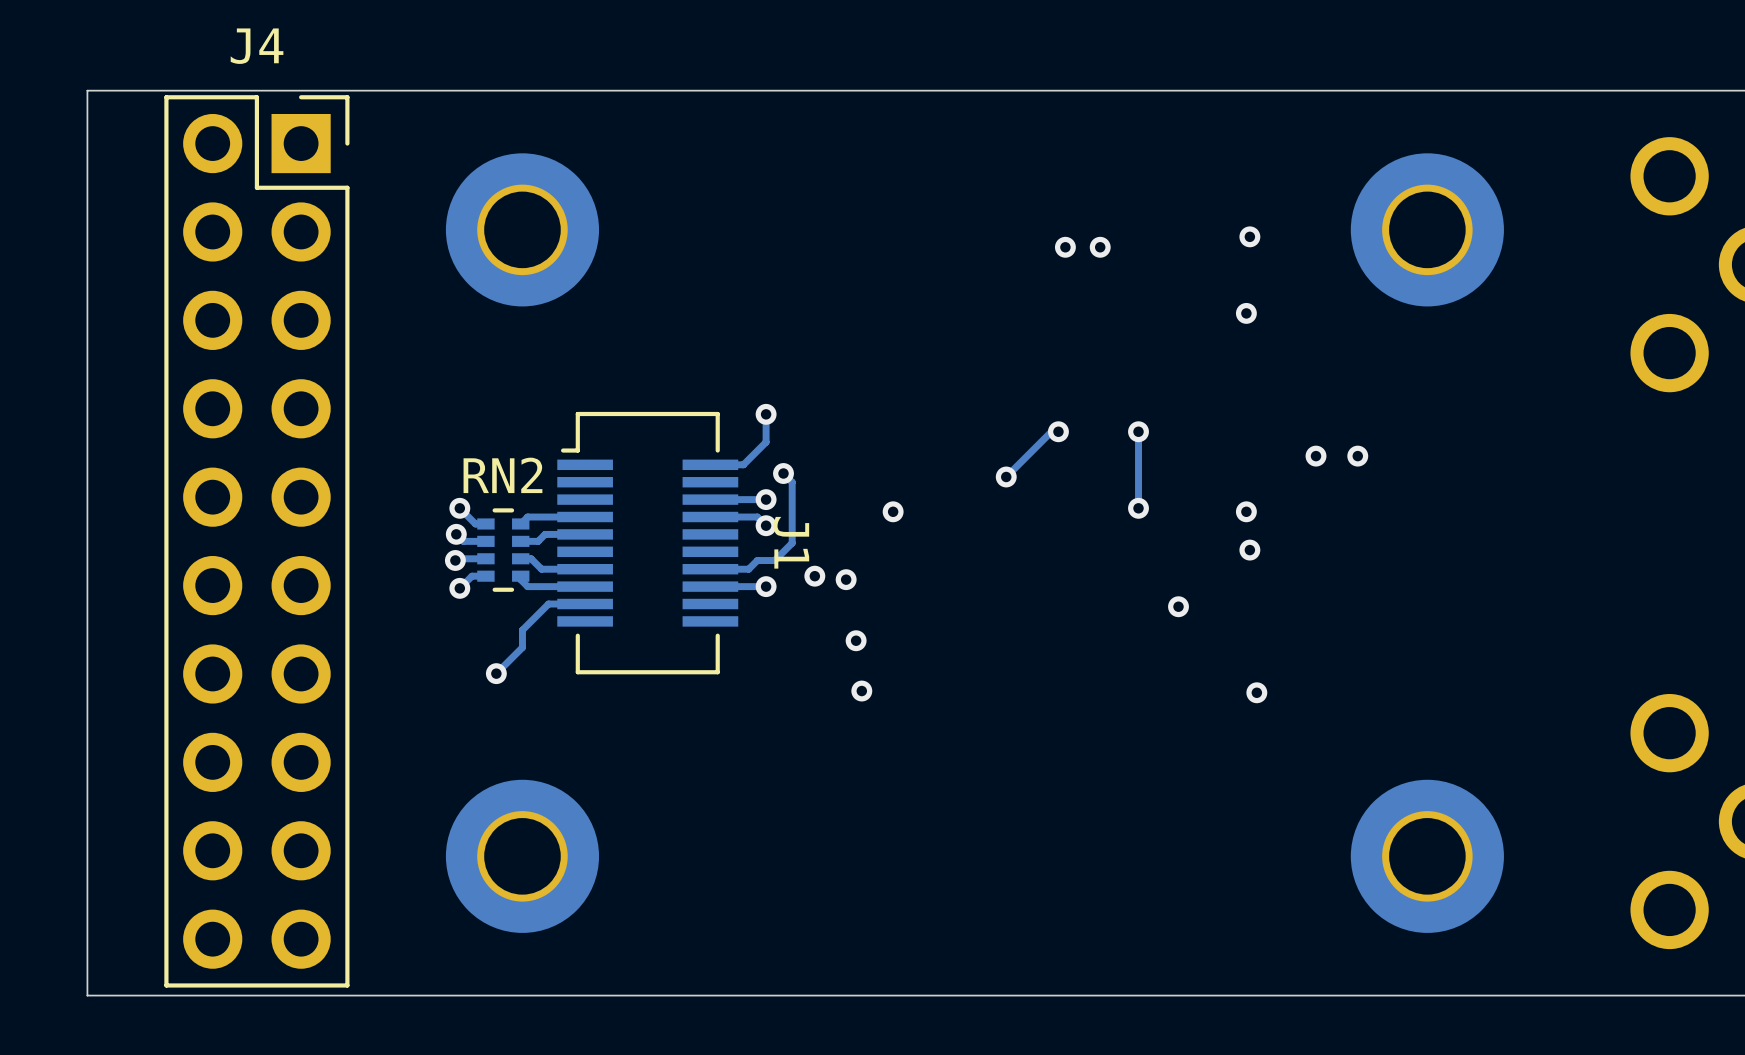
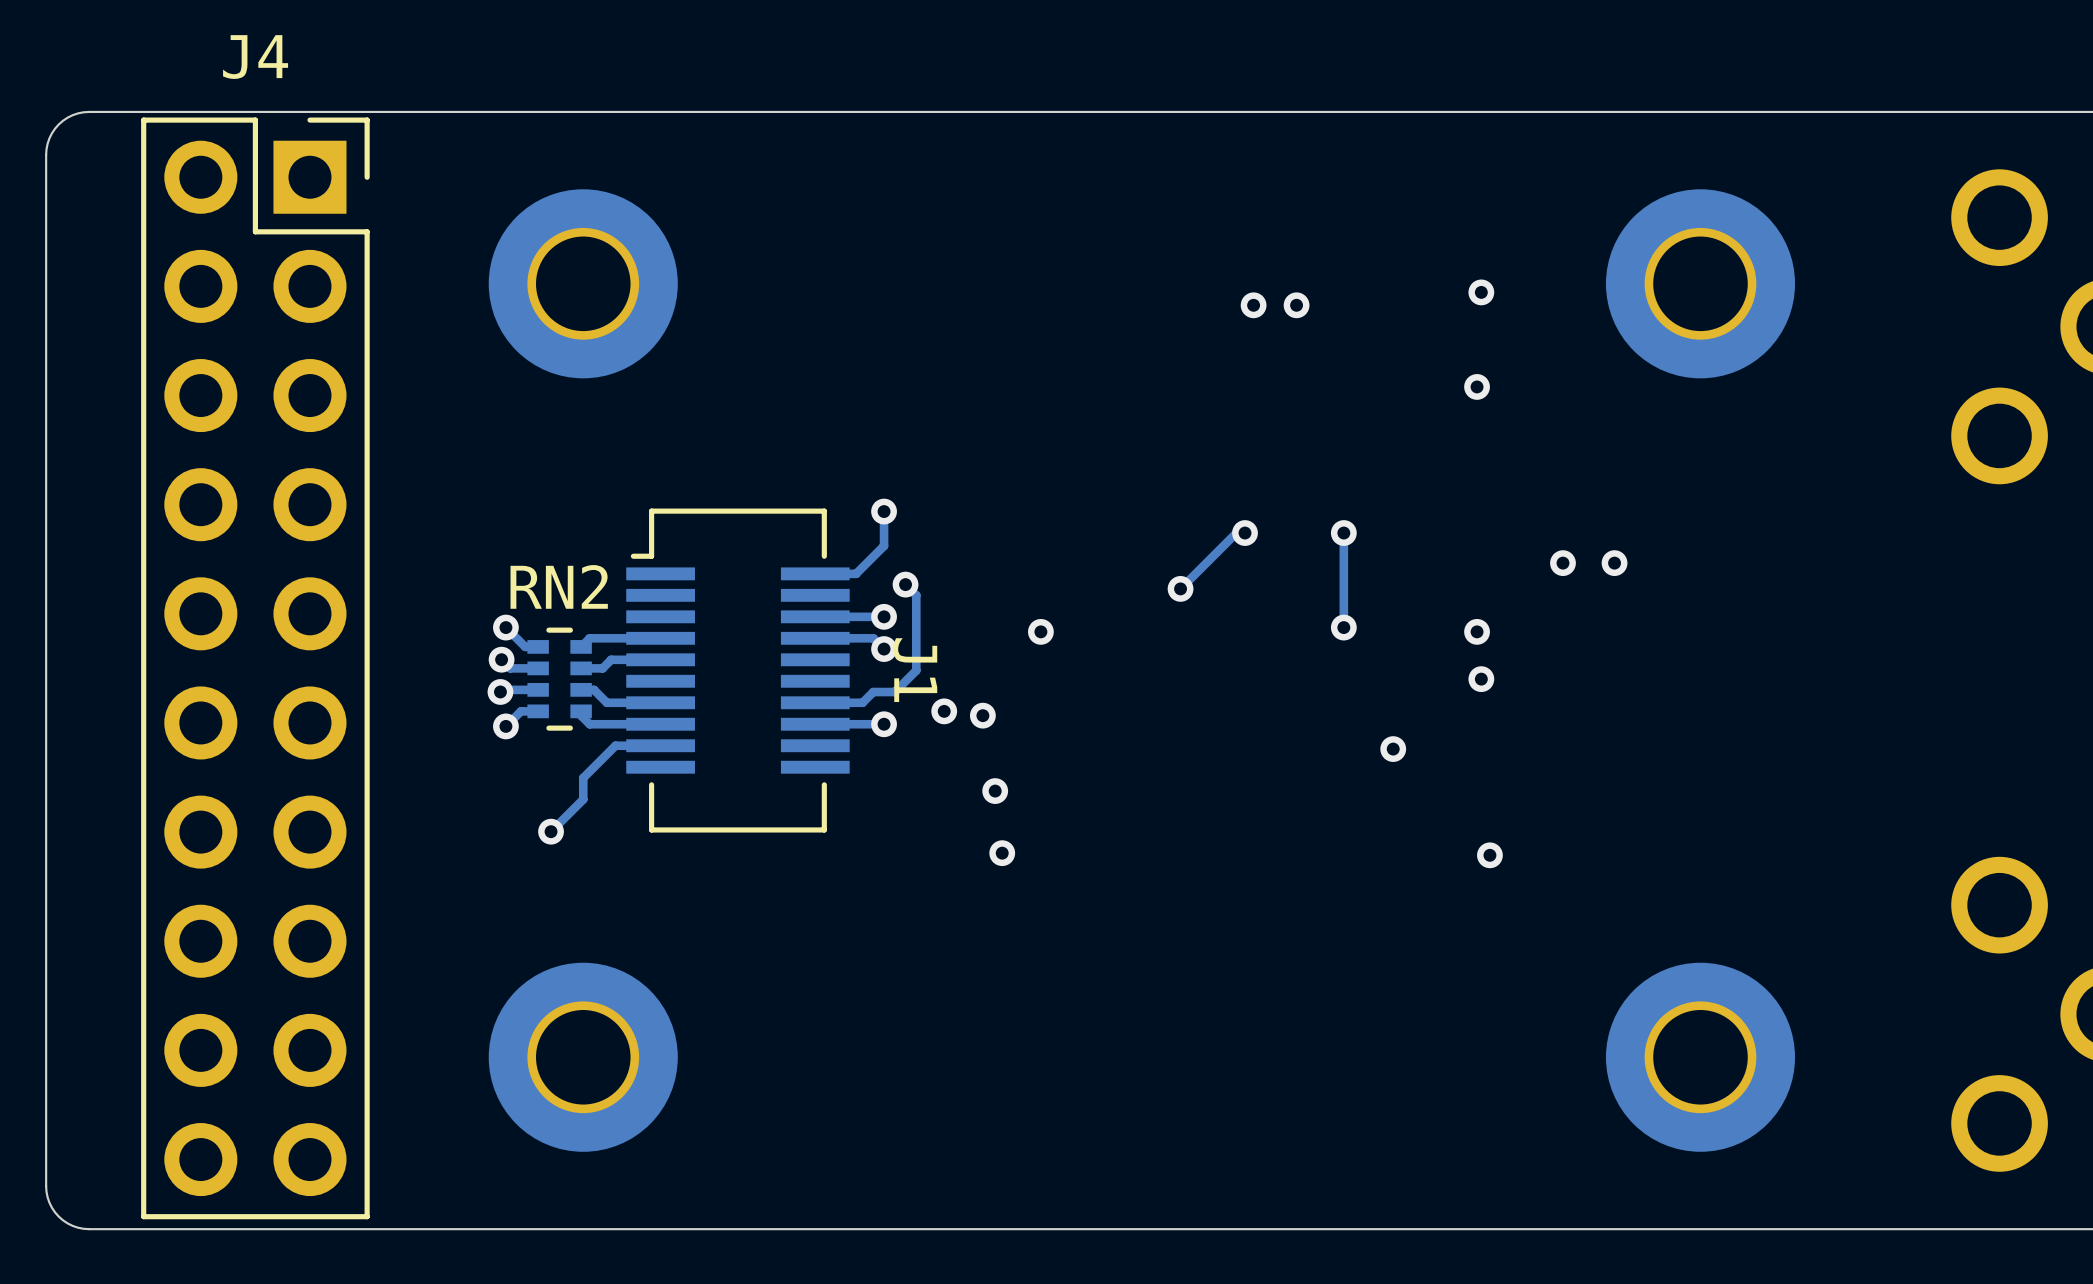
board edge: (122, 90) (87, 90) (87, 125) -> (89, 111) (72, 115) (58, 124) (49, 138) (46, 154)
board edge: (87, 960) (87, 995) (122, 995) -> (46, 1186) (49, 1202) (58, 1216) (72, 1225) (89, 1229)

